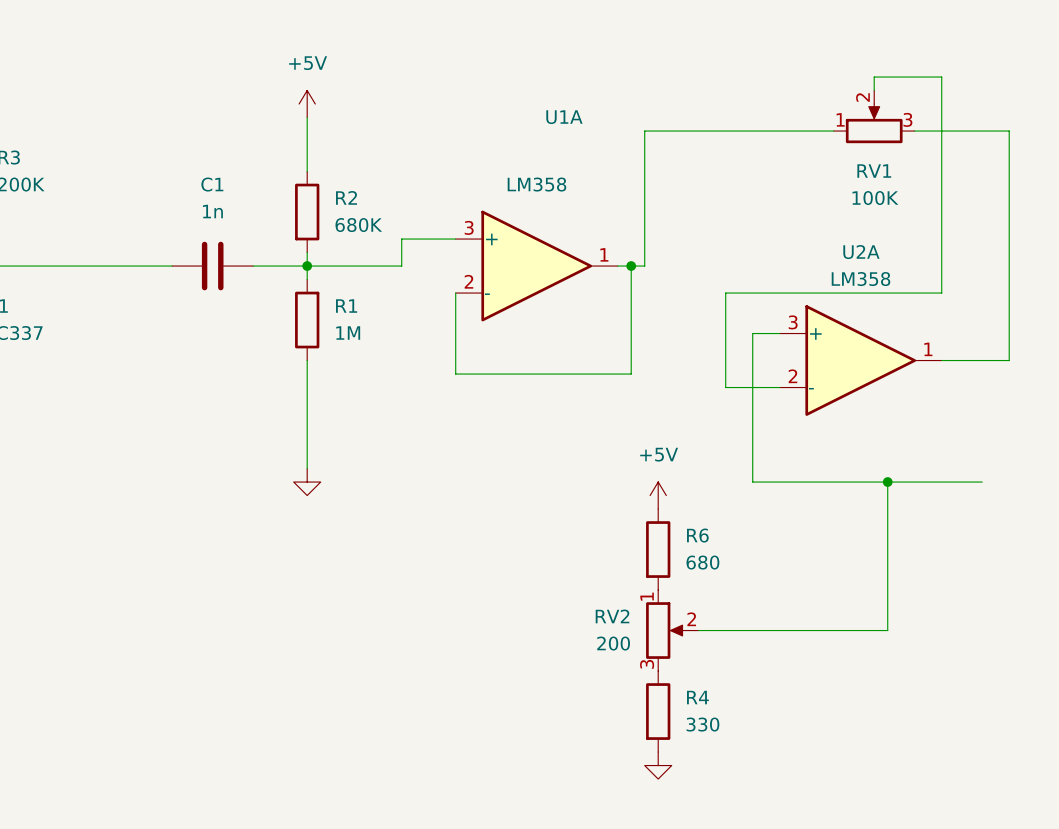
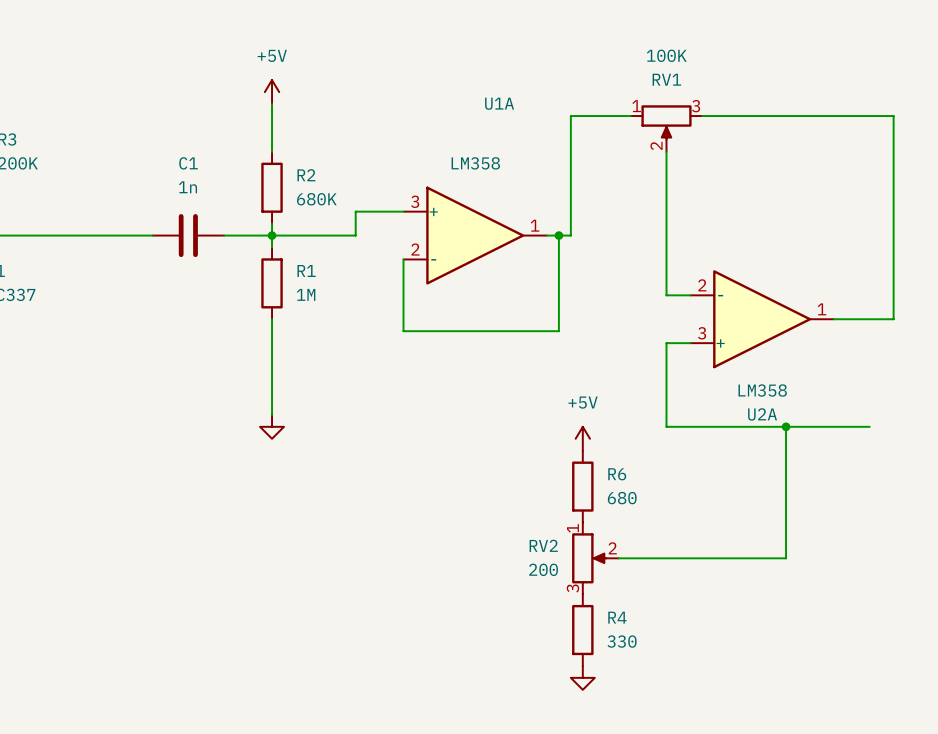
wire: (874, 90) (874, 77) (941, 77) (941, 293) (725, 293) (725, 387) (752, 387) (752, 333) -> (666, 151) (666, 295)
RV1 position: (874, 116) -> (666, 128)
RV1 flip: as is (874, 123) -> up-down (666, 122)
wire: (712, 131) (793, 131) -> (738, 116) (809, 116)
U2A flip: as is (860, 360) -> up-down (762, 319)

